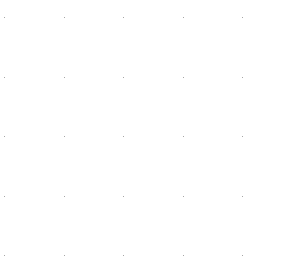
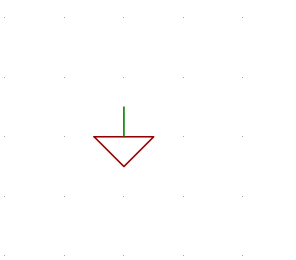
wire: none -> (123, 107) (123, 136)
power symbol: none -> (123, 151)

